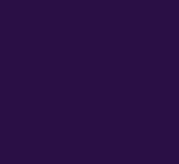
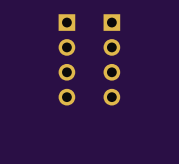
part: none -> (66, 59)
part: none -> (111, 59)

